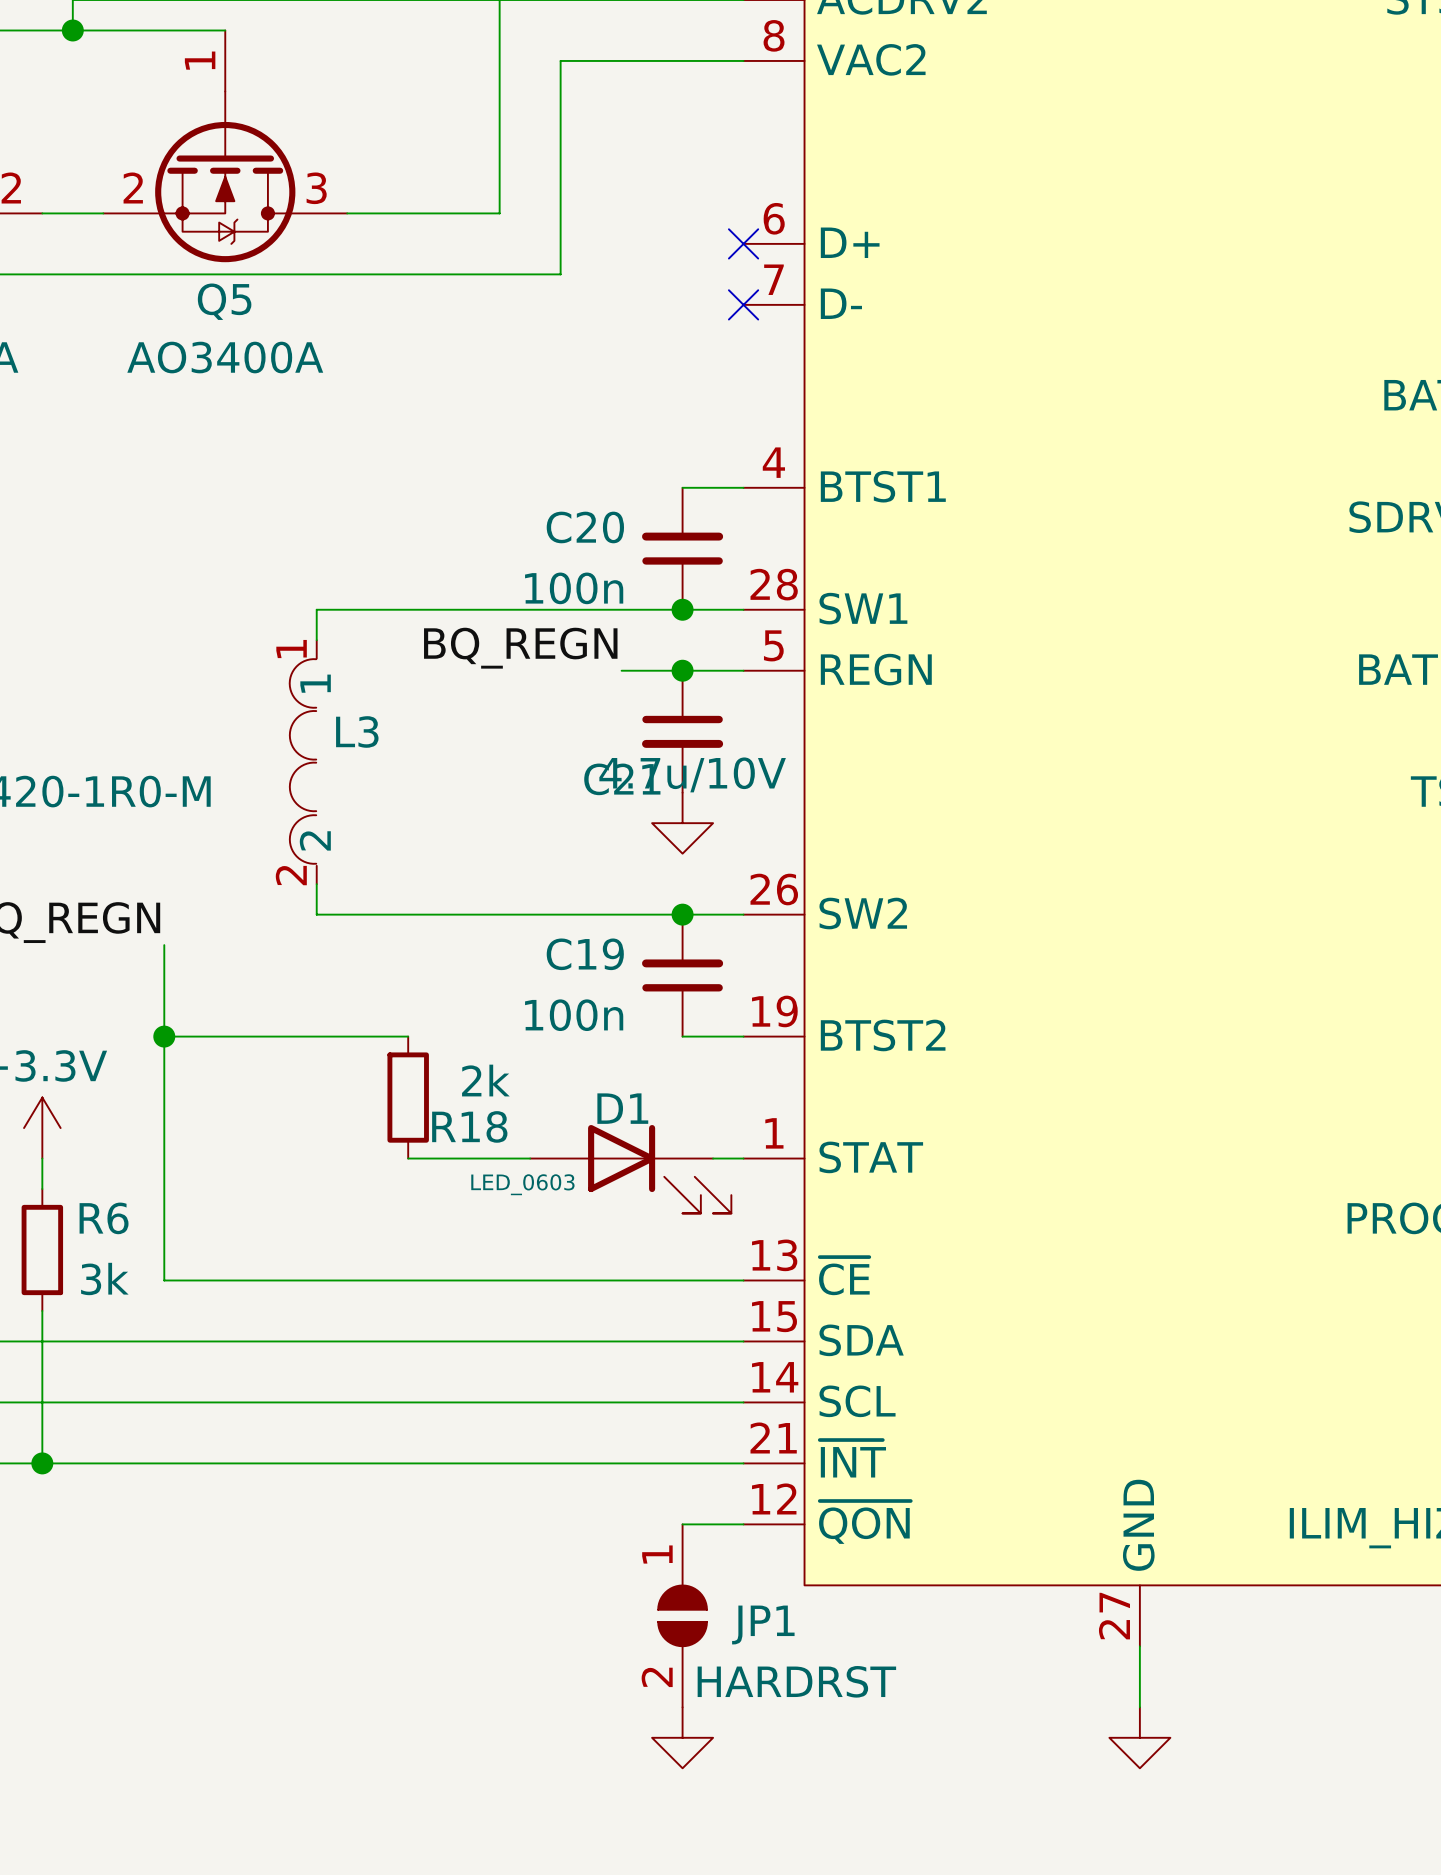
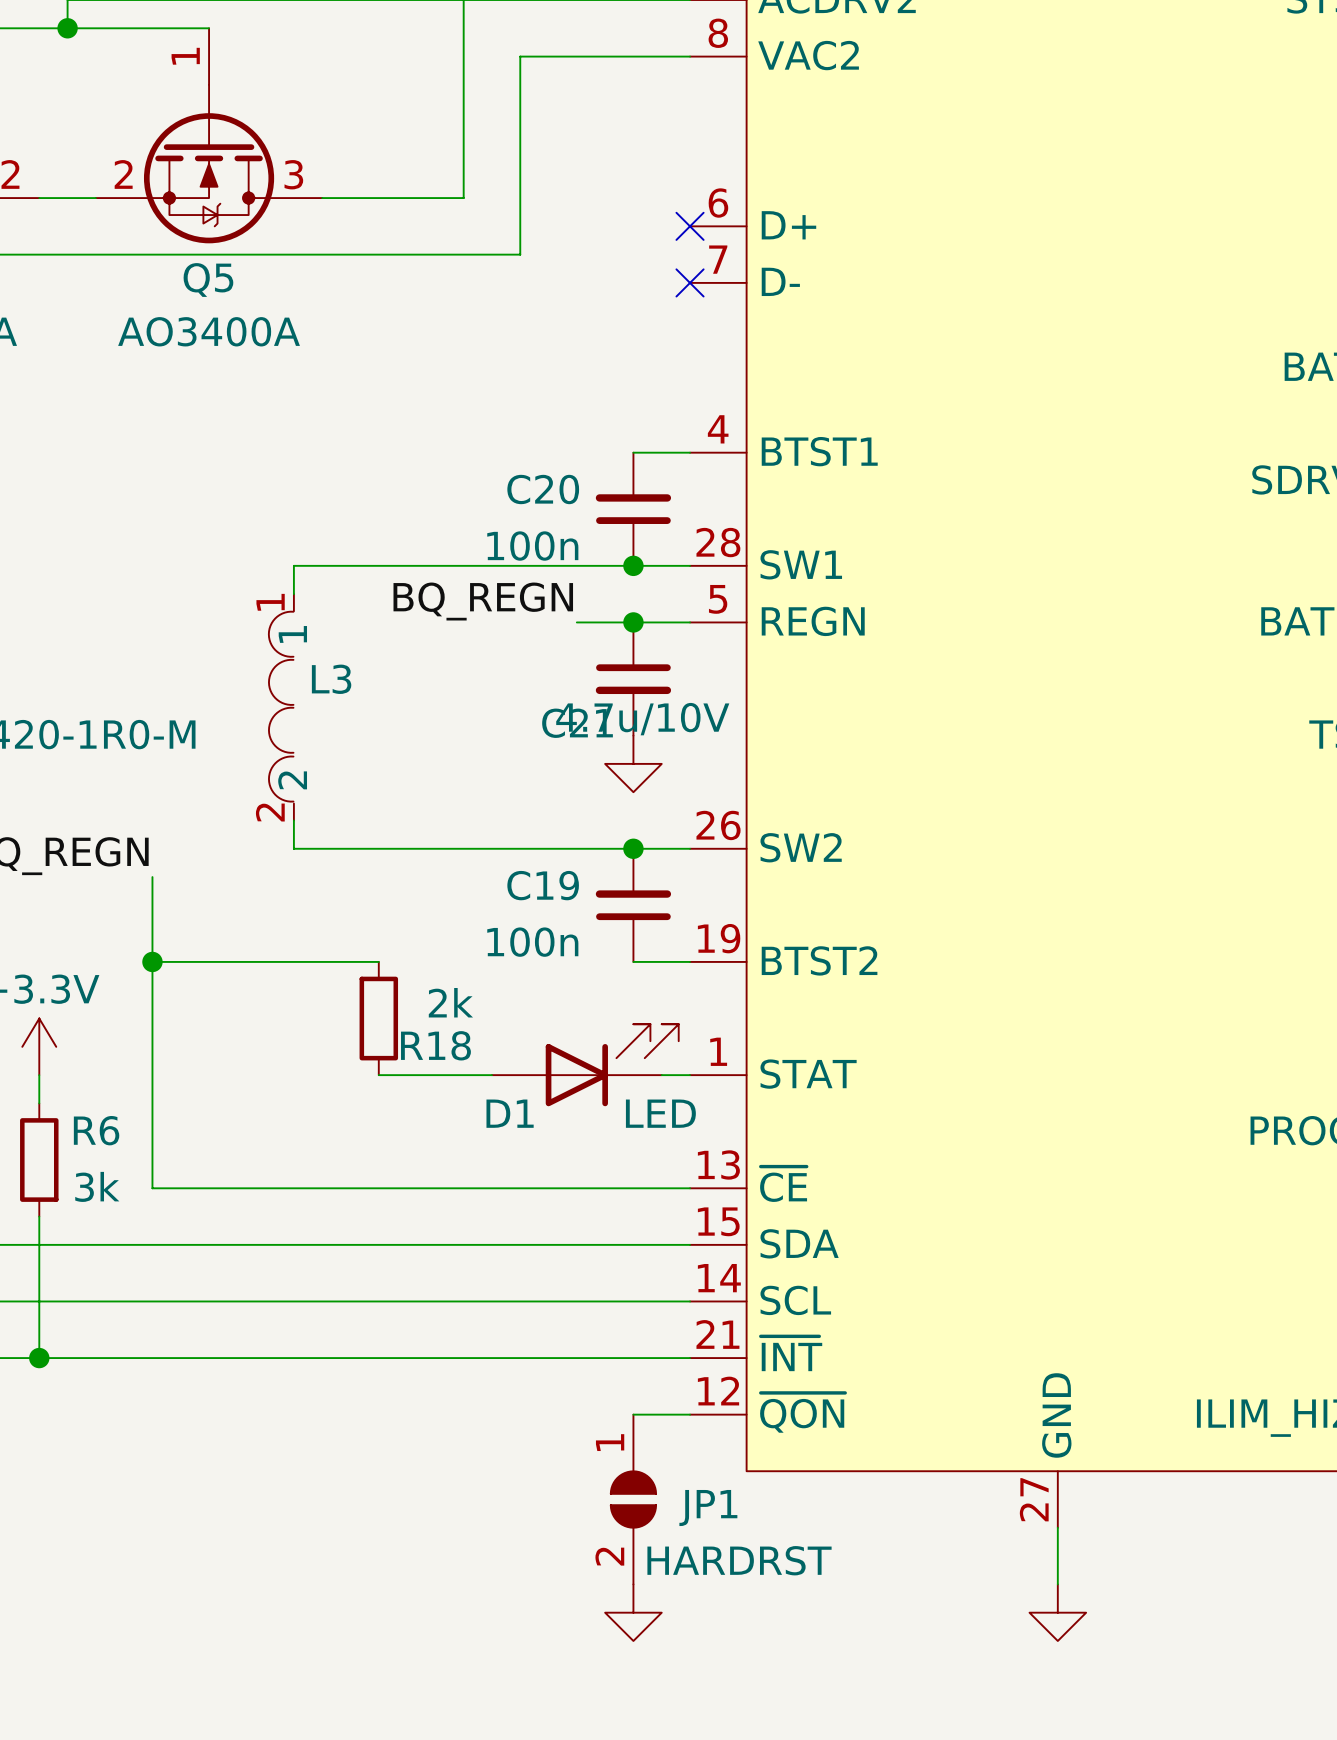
D1 name position: D1 (622, 1108) -> D1 (510, 1113)
D1 flip: as is (659, 1169) -> up-down (612, 1065)
D1 value: LED_0603 (522, 1184) -> LED (660, 1113)

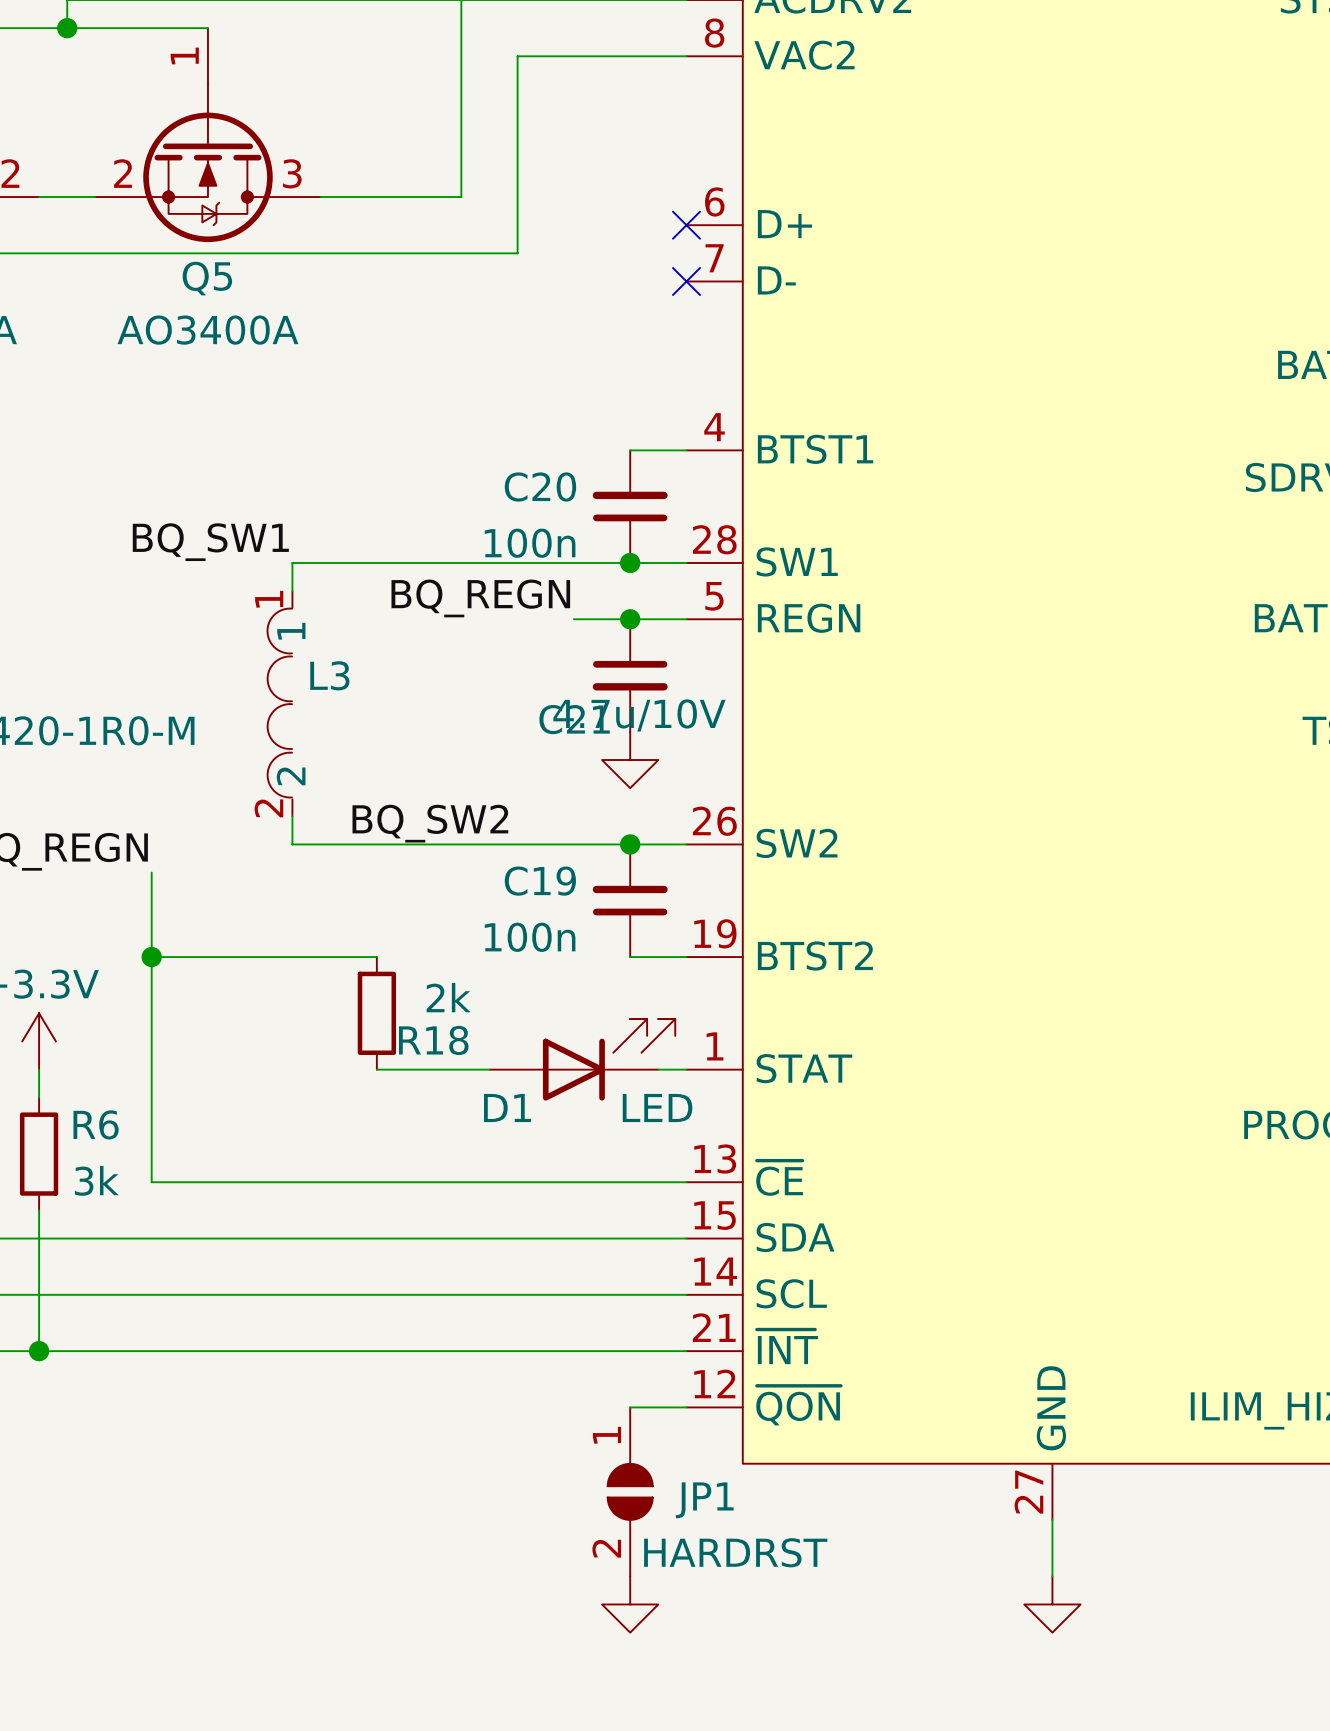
label: none -> BQ_SW1 (210, 542)
label: none -> BQ_SW2 (430, 823)

